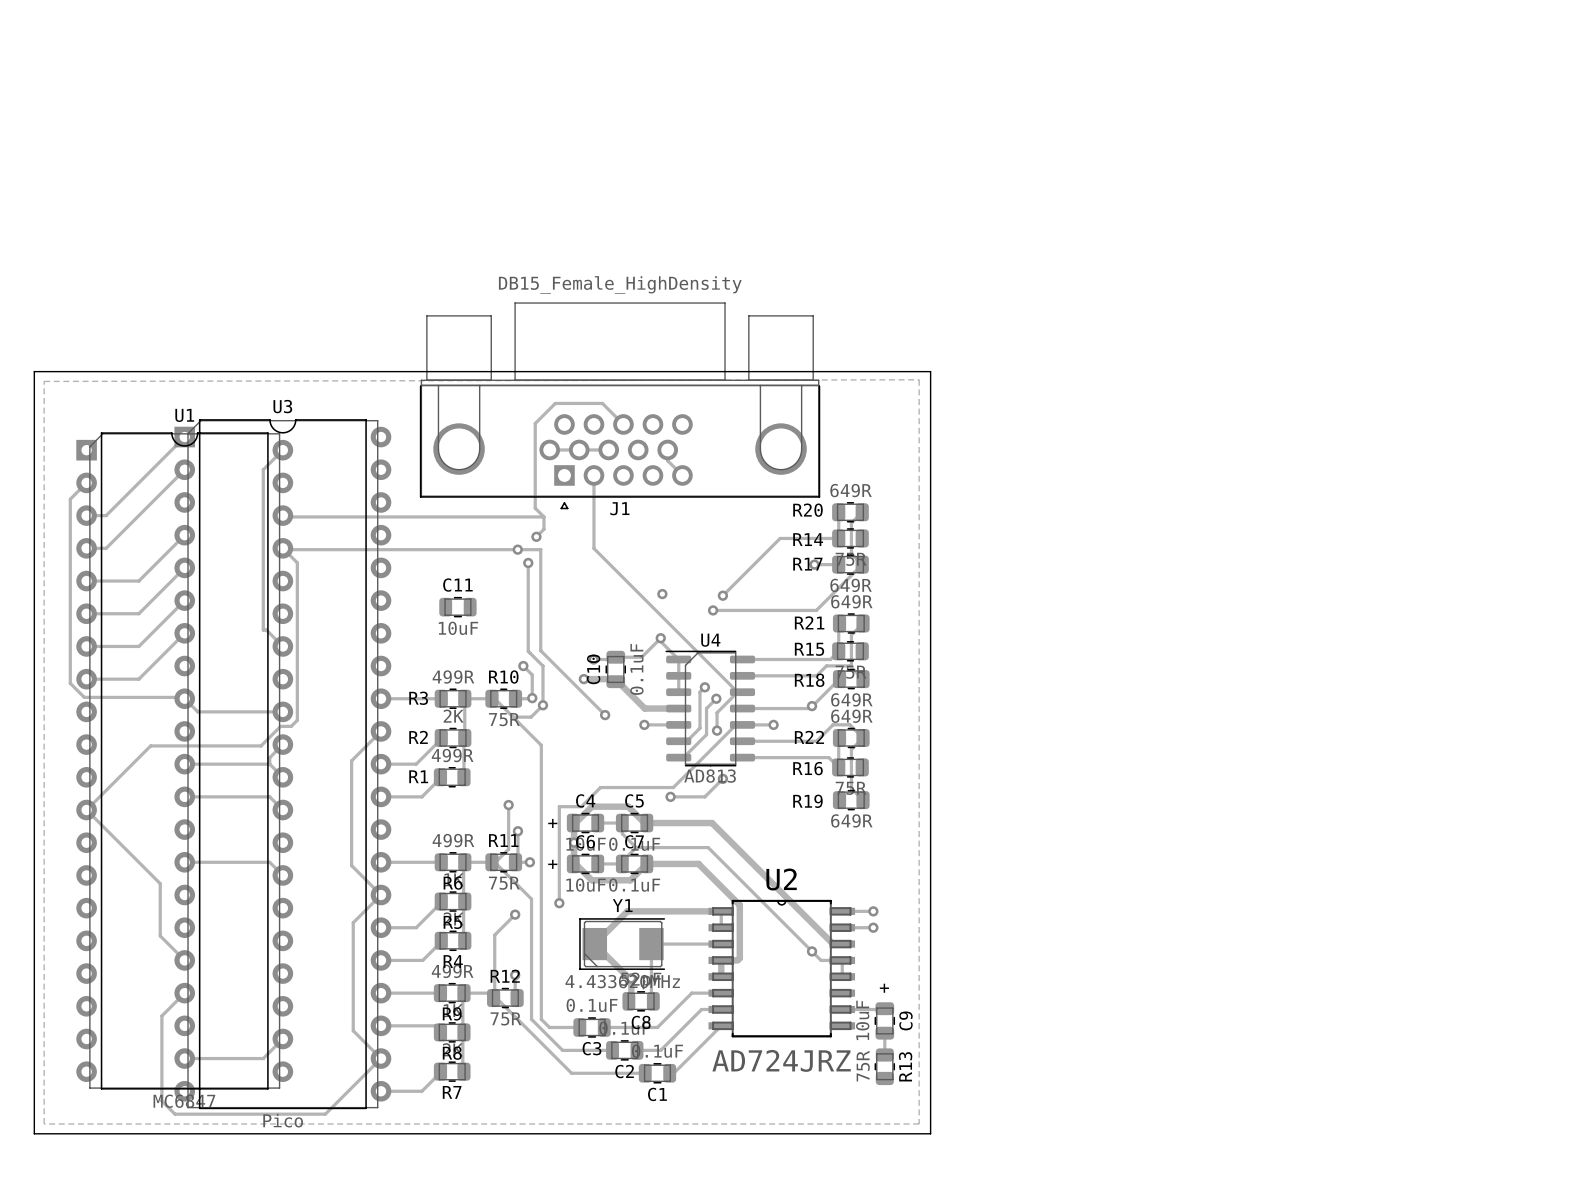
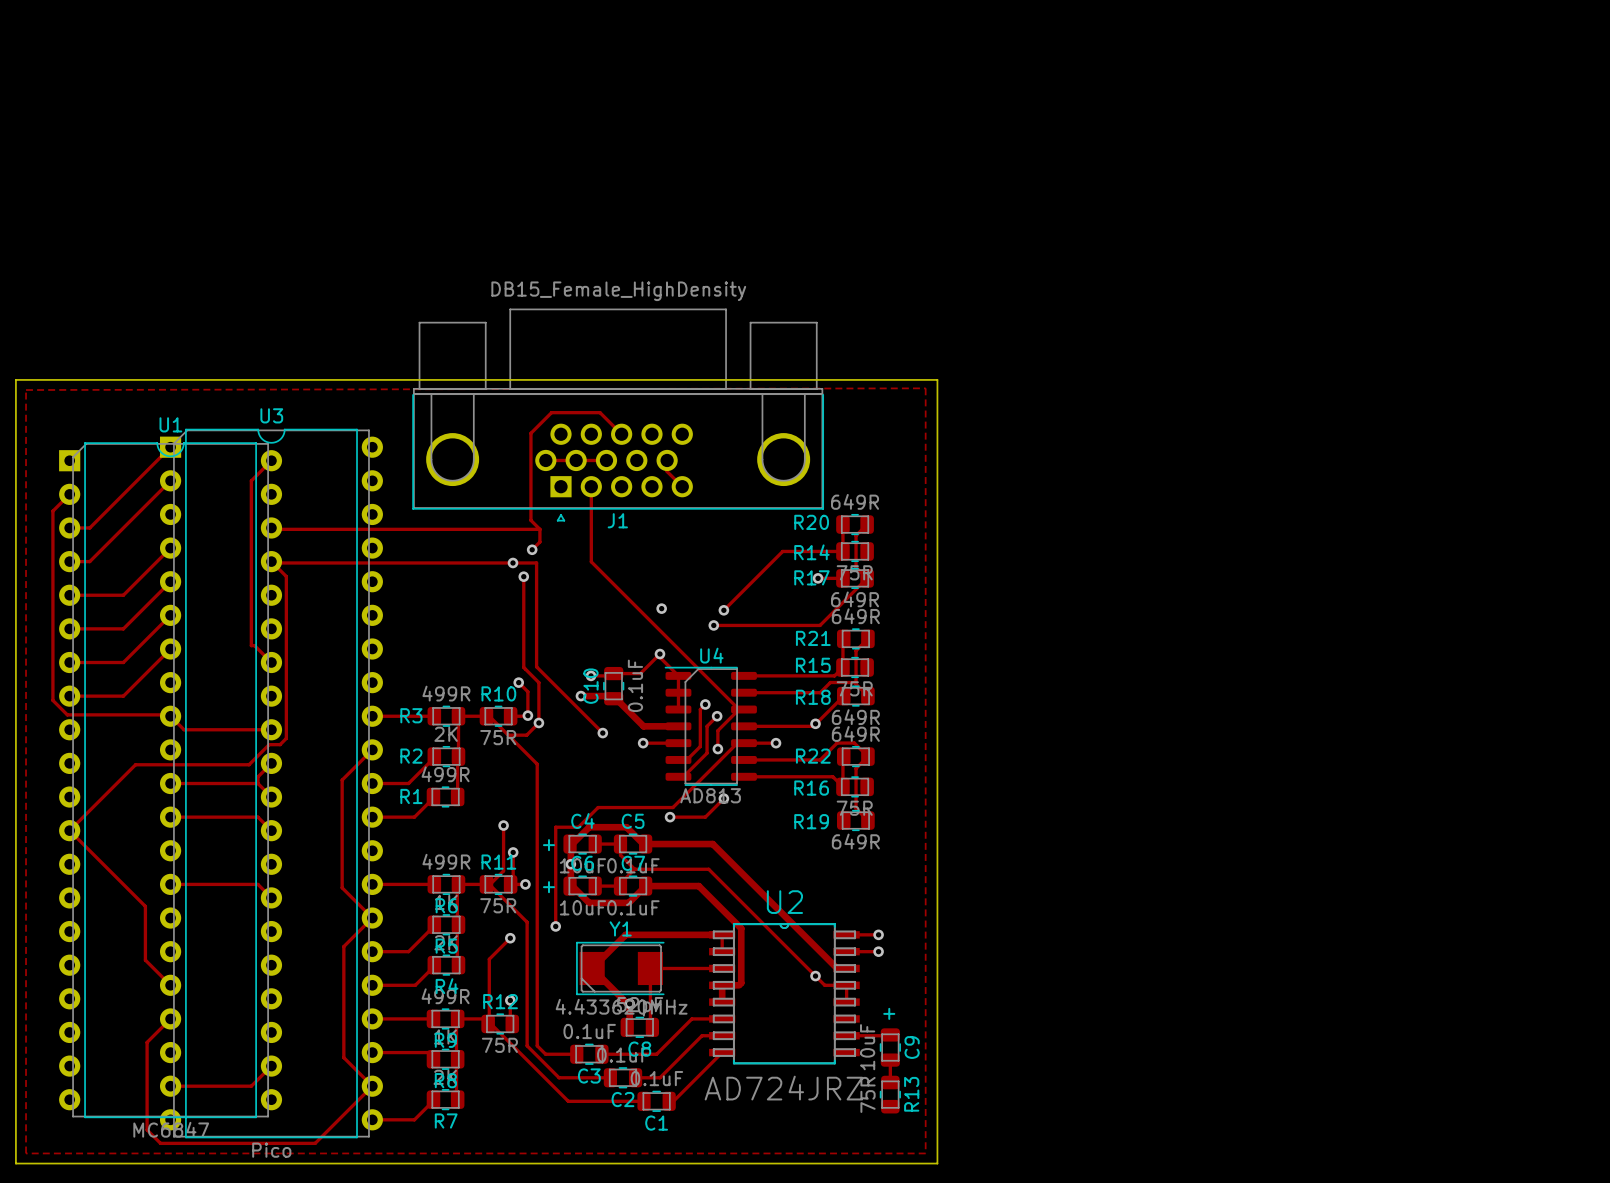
C11: 10uF (457, 607) -> none

